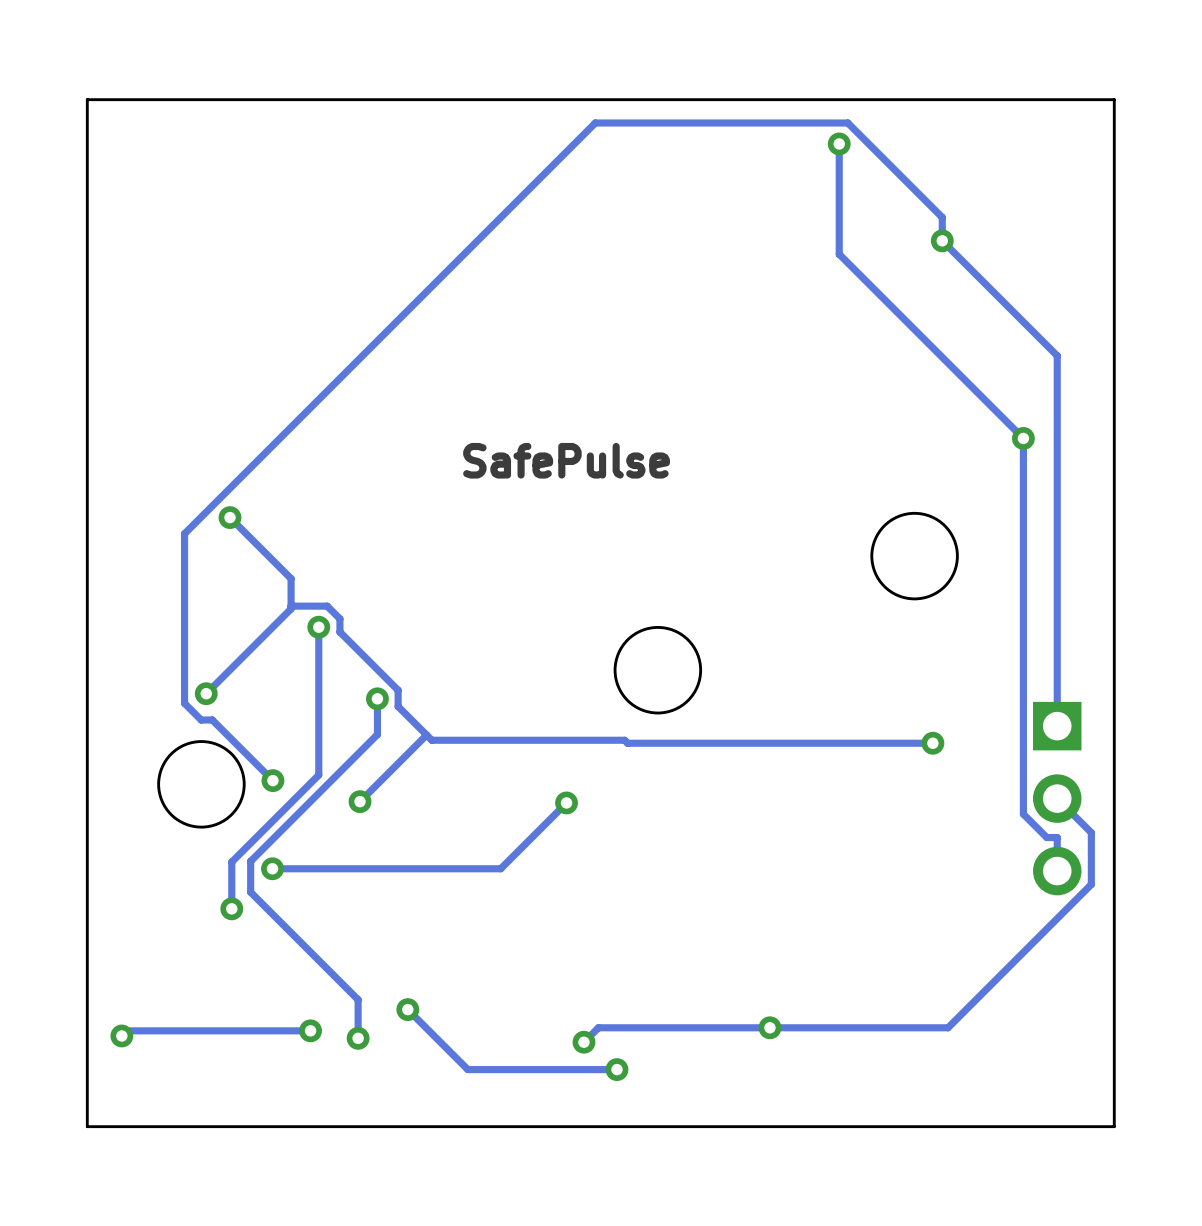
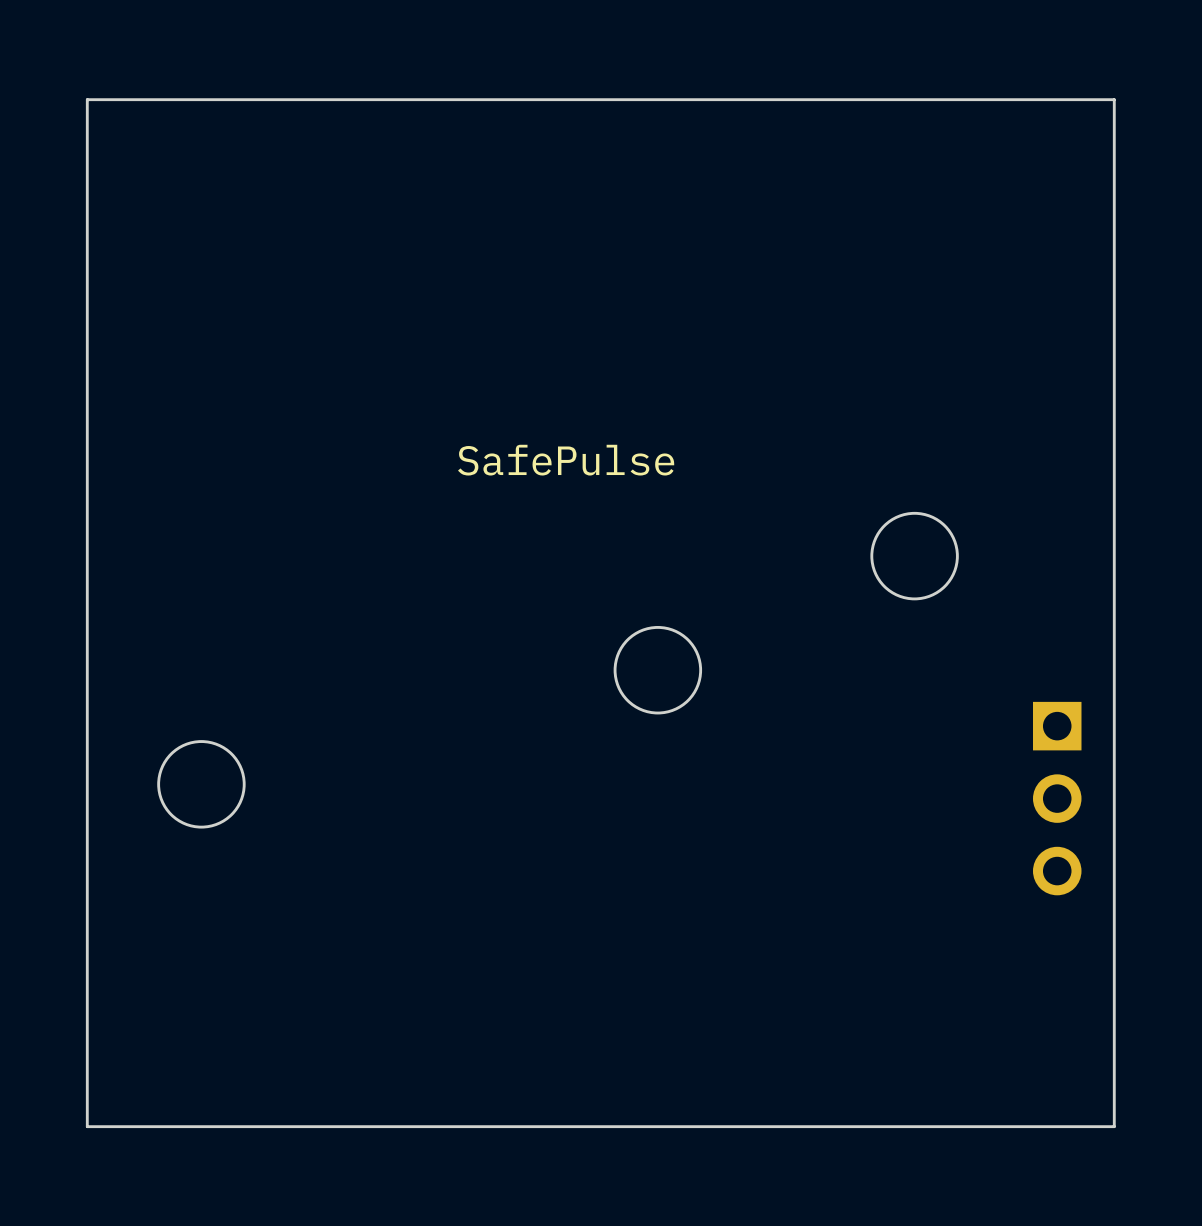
track: (839, 143) (839, 254) (1023, 438) (1023, 814) (1046, 837) (1057, 837) (1057, 871) -> none
via: (839, 143) -> none
via: (942, 240) -> none
via: (1023, 438) -> none
track: (229, 517) (291, 578) (291, 608) (206, 693) -> none
via: (229, 517) -> none
track: (291, 606) (327, 606) (339, 618) (339, 632) (398, 690) (398, 706) (431, 740) (624, 740) (627, 743) (932, 743) -> none
track: (318, 627) (318, 775) (231, 862) (231, 908) -> none
via: (318, 627) -> none
via: (206, 693) -> none
track: (377, 698) (377, 734) (250, 861) (250, 892) (358, 999) (358, 1038) -> none
via: (377, 698) -> none
track: (1057, 726) (1057, 355) (942, 240) (942, 217) (847, 123) (595, 123) (184, 533) (184, 703) (201, 720) (212, 720) (272, 780) -> none
track: (426, 735) (360, 801) -> none
via: (932, 743) -> none
via: (272, 780) -> none
track: (1057, 798) (1091, 832) (1091, 884) (948, 1027) (598, 1027) (583, 1042) -> none
via: (360, 801) -> none
track: (566, 802) (500, 868) (272, 868) -> none
via: (566, 802) -> none
via: (272, 868) -> none
via: (231, 908) -> none
track: (407, 1009) (467, 1069) (616, 1069) -> none
via: (407, 1009) -> none
via: (769, 1027) -> none
track: (310, 1030) (126, 1030) (121, 1035) -> none
via: (310, 1030) -> none
via: (121, 1035) -> none
via: (358, 1038) -> none
via: (583, 1042) -> none
via: (616, 1069) -> none

